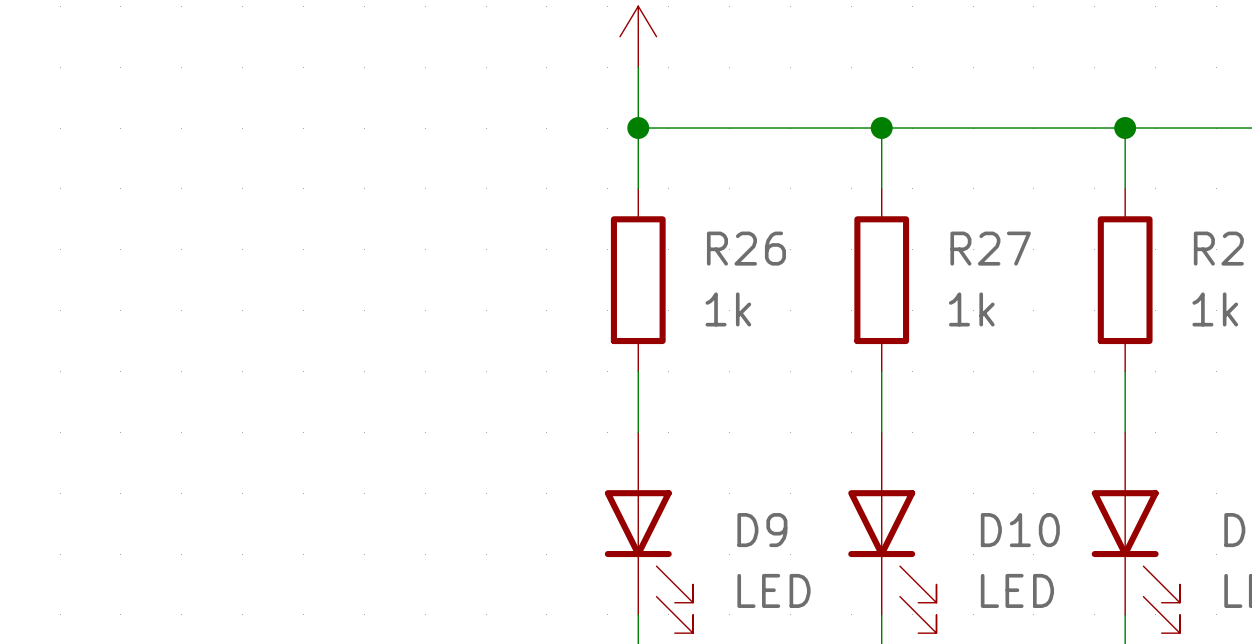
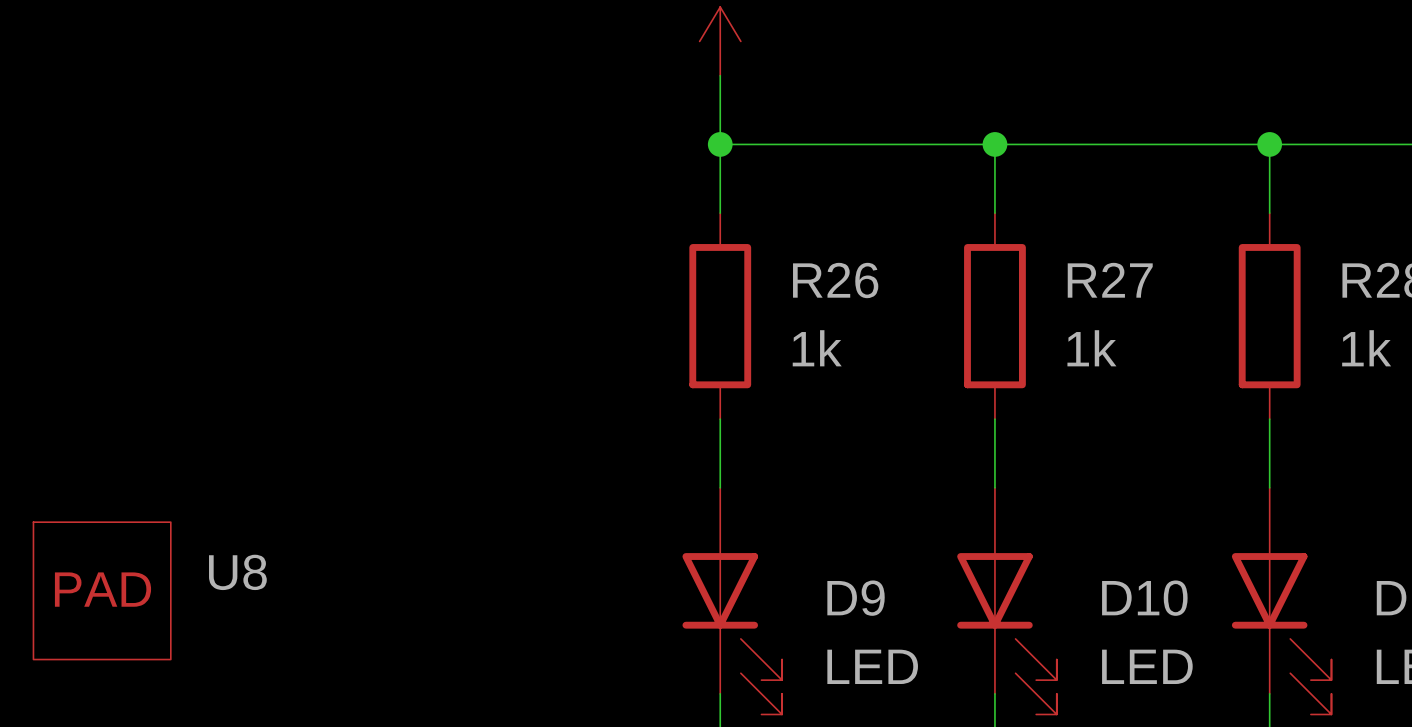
U8: none -> (102, 590)

